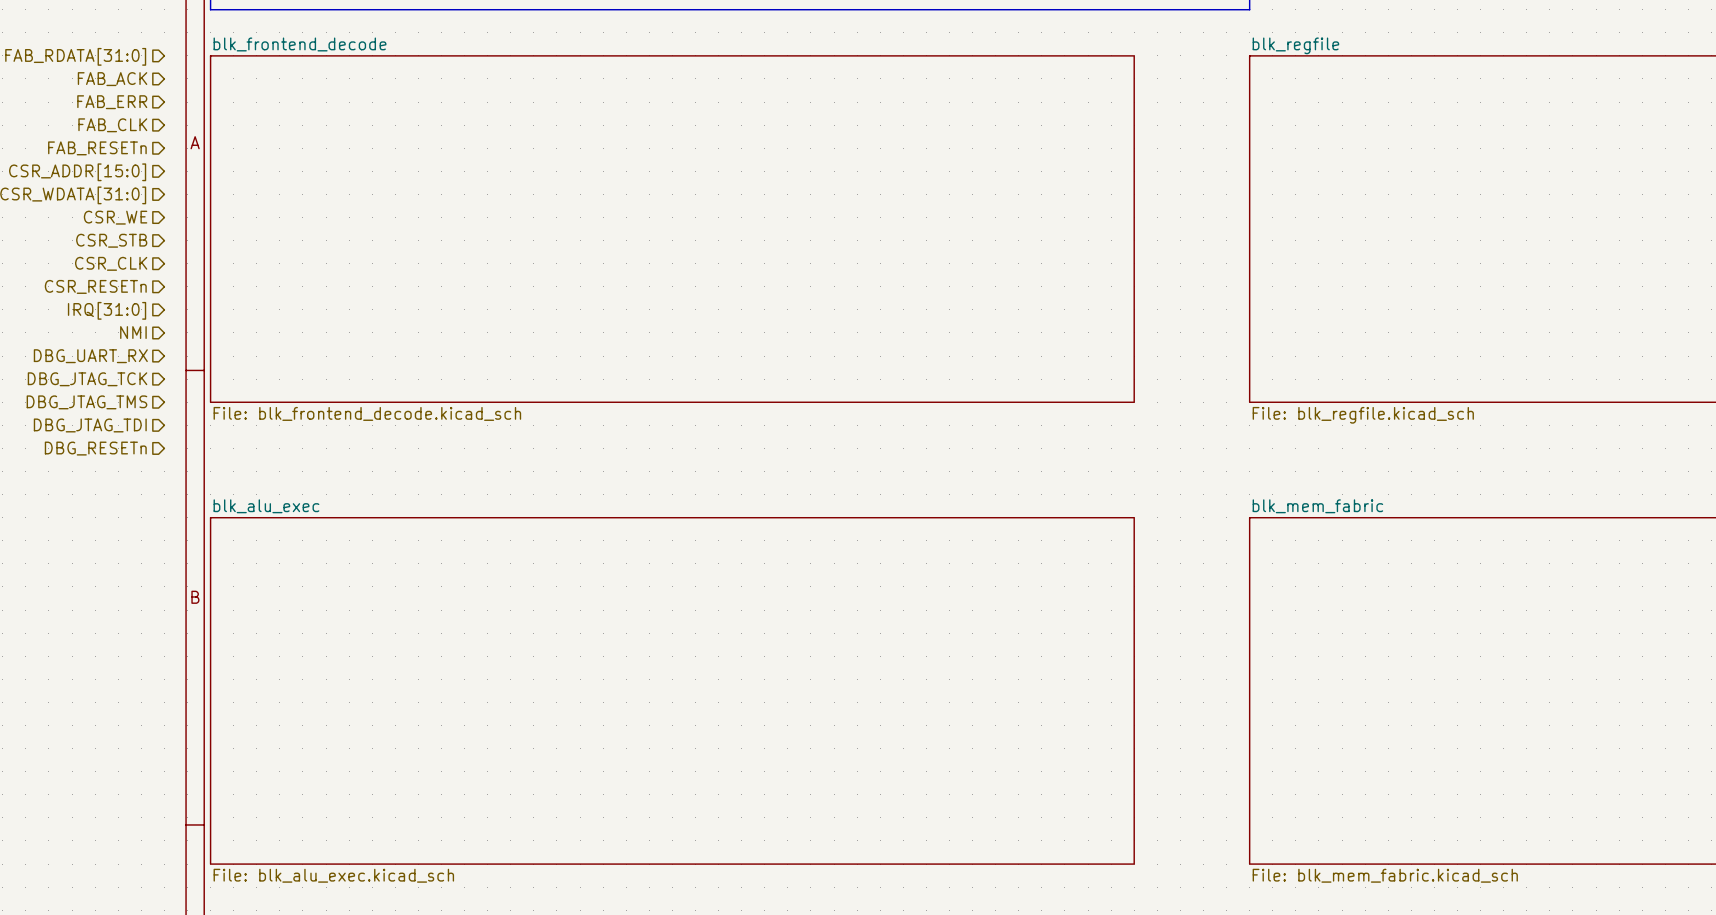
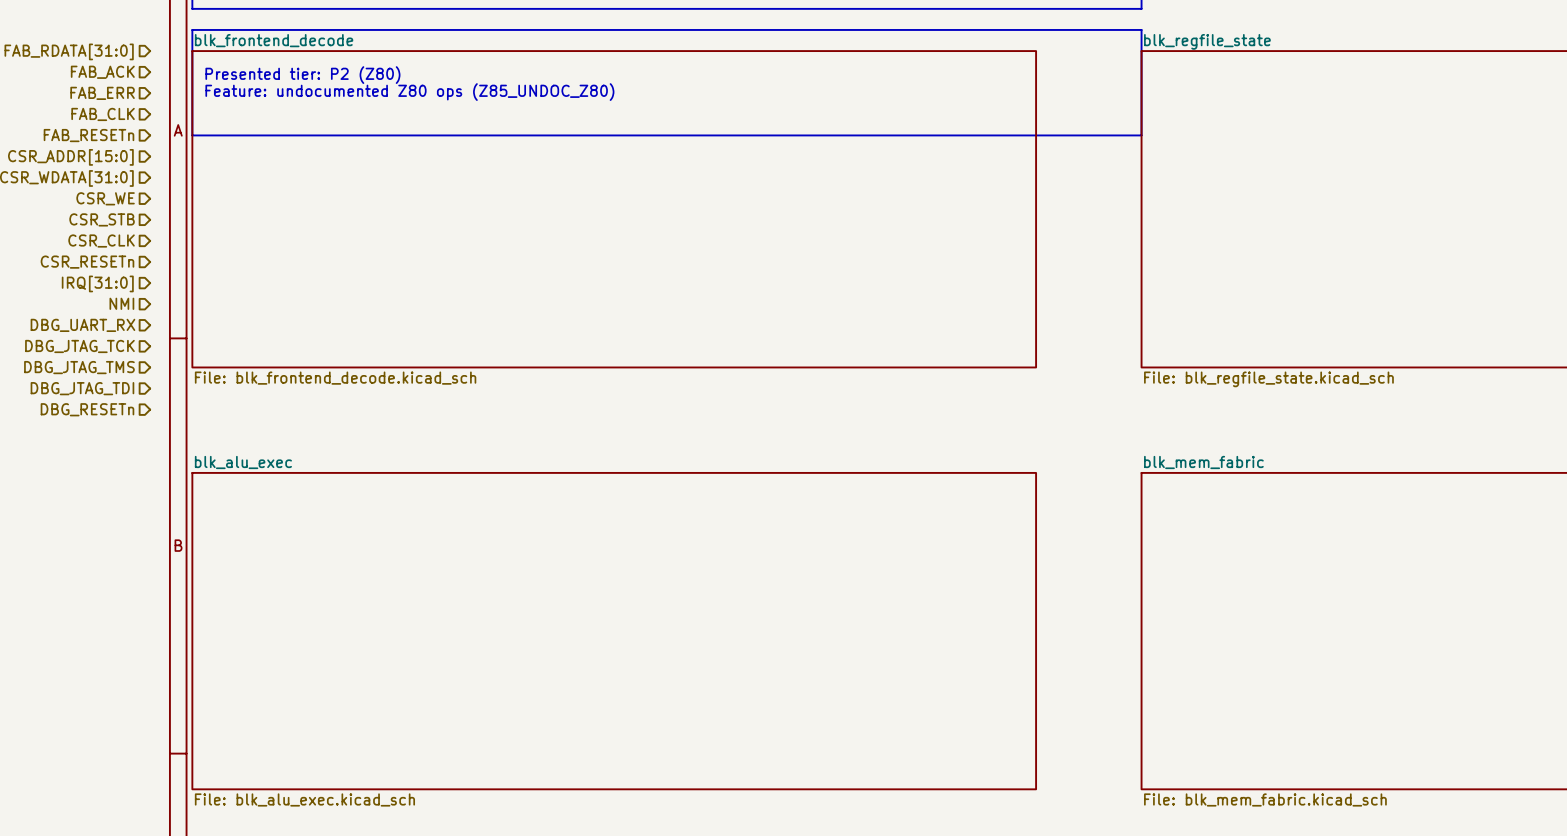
line: none -> (192, 29) (1141, 29) (1141, 135) (192, 135) (192, 29)
sheet blk_regfile name: blk_regfile (1295, 45) -> blk_regfile_state (1207, 41)
text: none -> Presented tier: P2 (Z80) (302, 75)
text: none -> Feature: undocumented Z80 ops (Z85_UNDOC_Z80) (409, 92)
sheet blk_regfile value: File: blk_regfile.kicad_sch (1363, 415) -> File: blk_regfile_state.kicad_sch (1268, 379)

